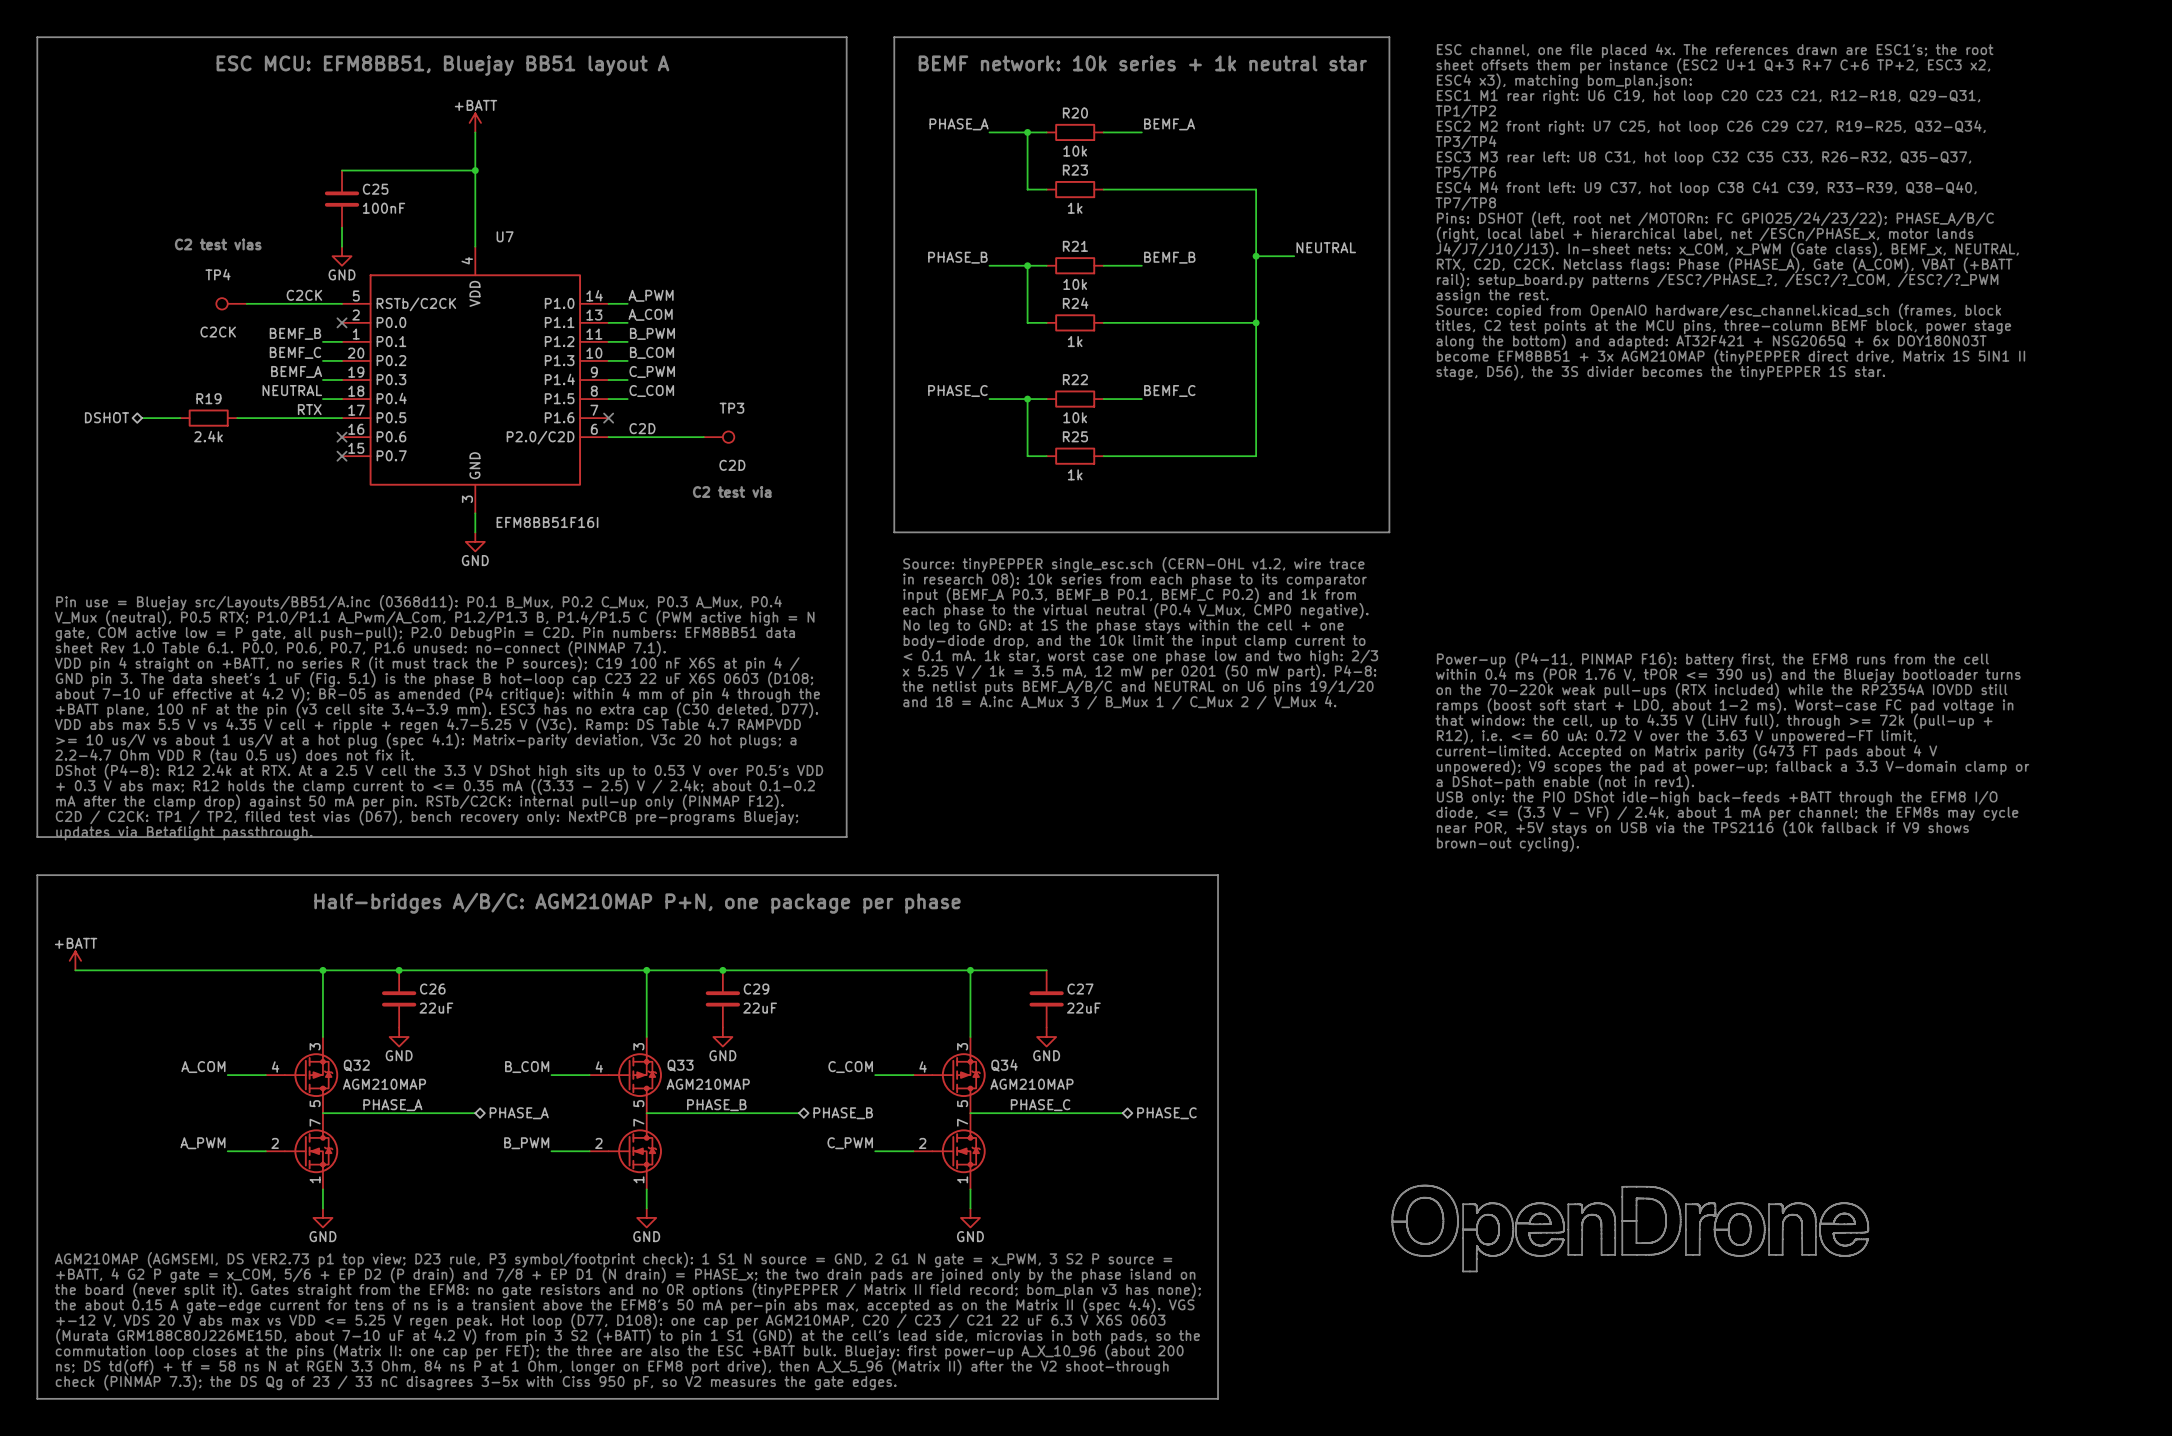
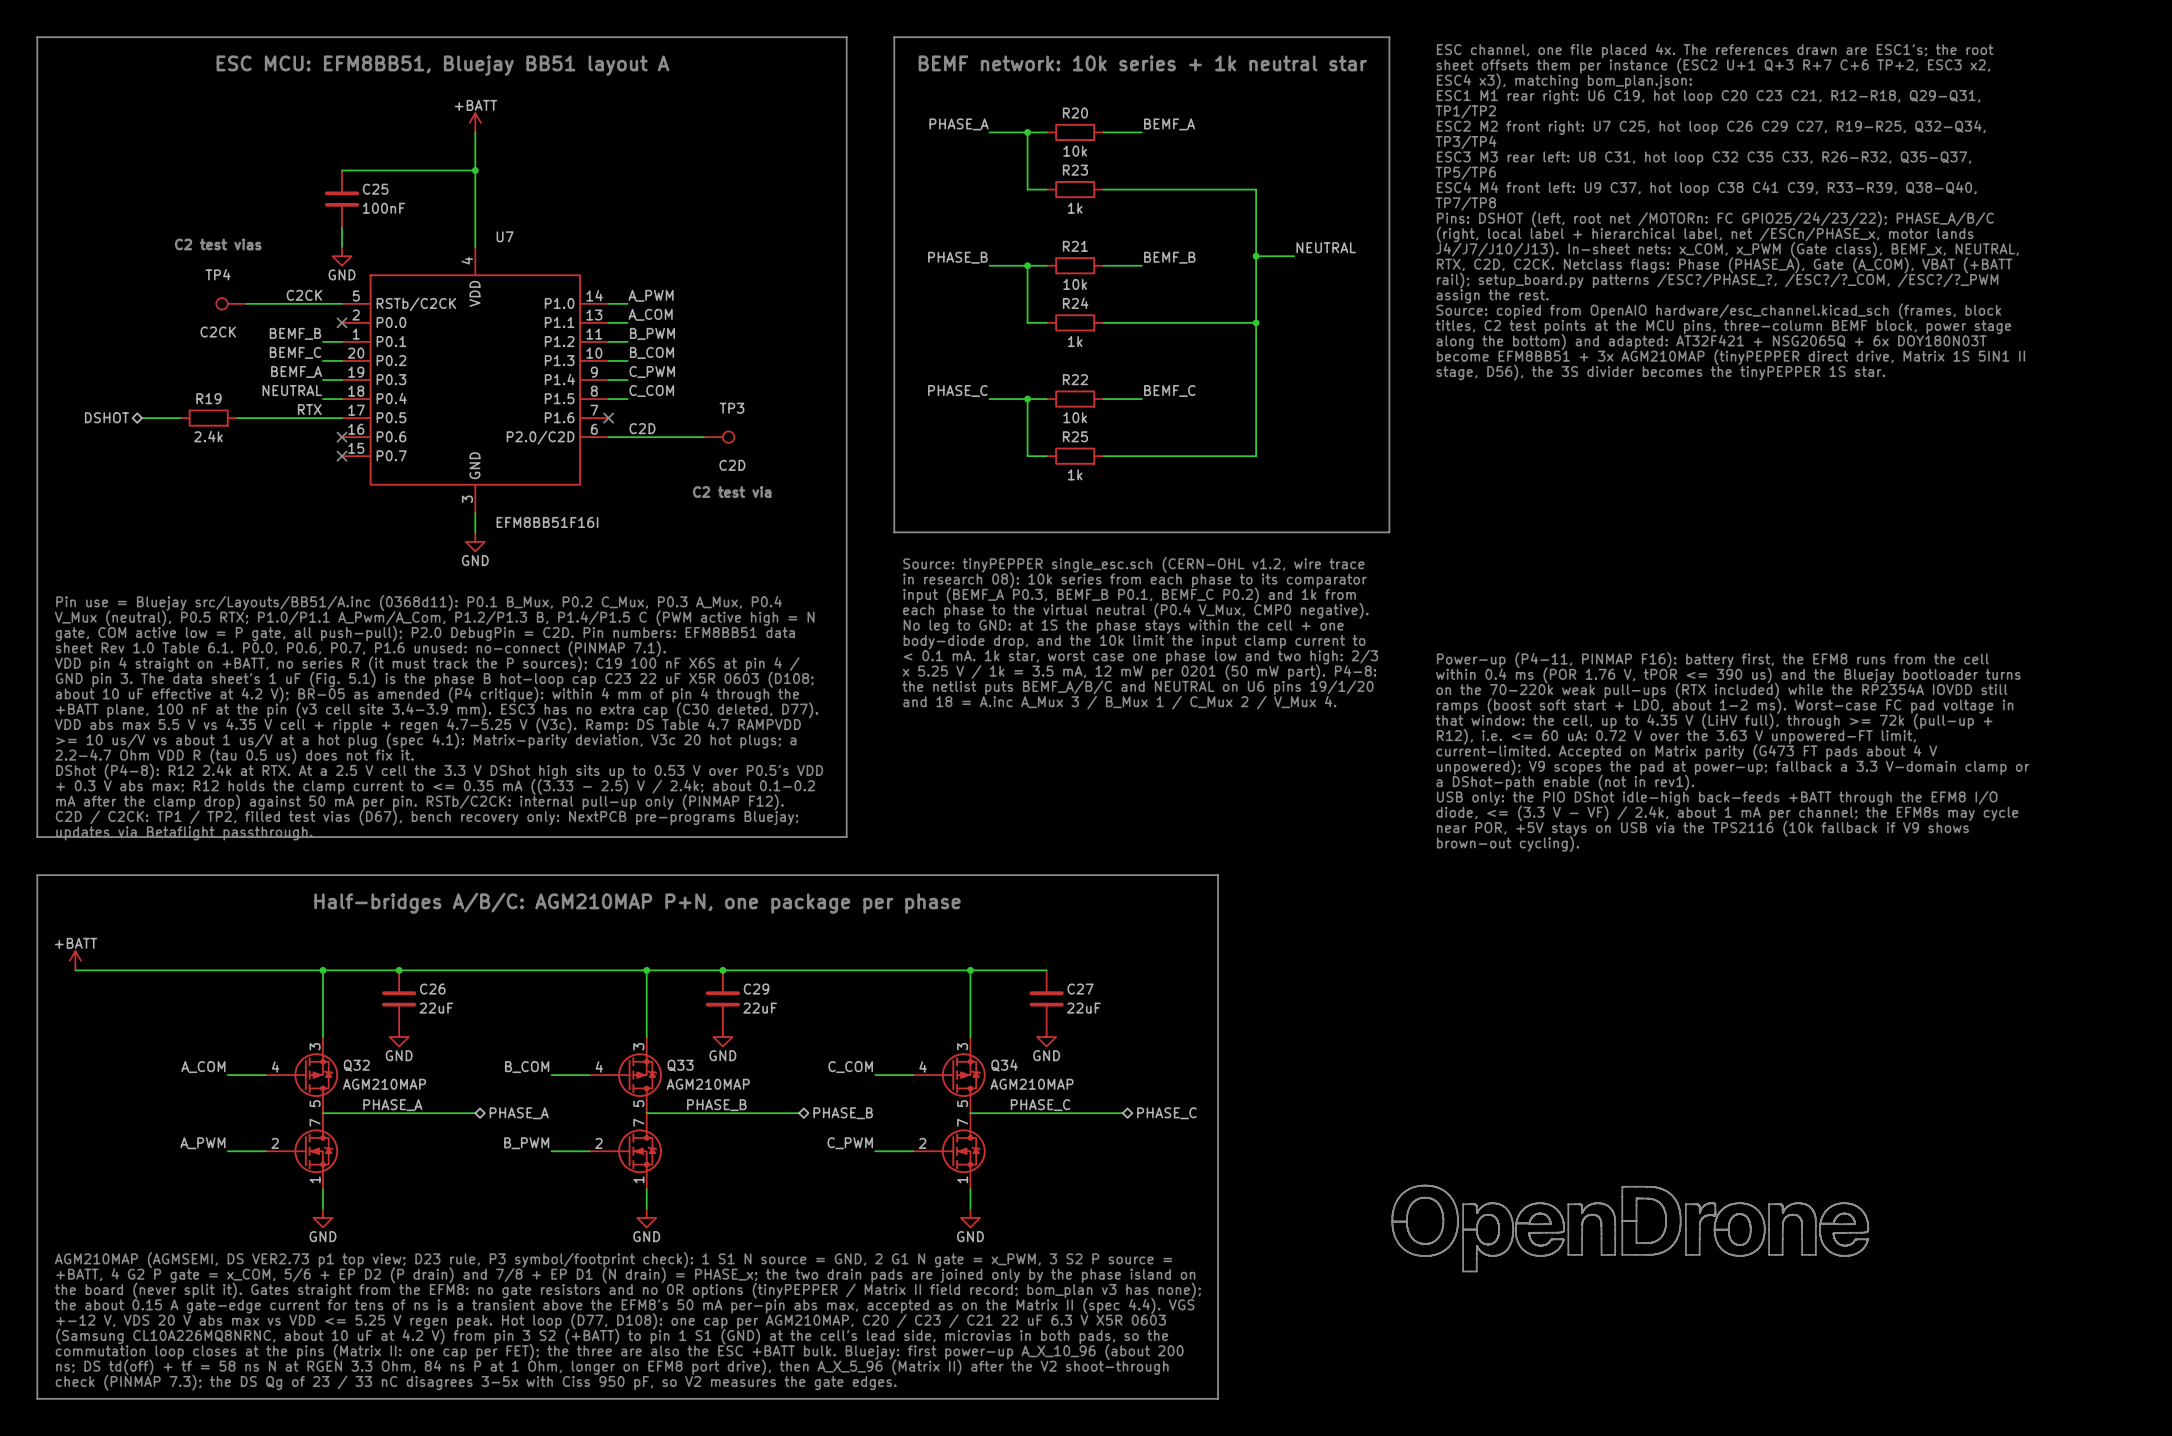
text: GND pin 3. The data sheet's 1 uF (Fig. 5.1) is the phase B hot-loop cap C23 22 uF X6S 0603 (D108; (434, 679) -> GND pin 3. The data sheet's 1 uF (Fig. 5.1) is the phase B hot-loop cap C23 22 uF X5R 0603 (D108; (434, 679)
text: about 7-10 uF effective at 4.2 V); BR-05 as amended (P4 critique): within 4 mm of pin 4 through the (437, 694) -> about 10 uF effective at 4.2 V); BR-05 as amended (P4 critique): within 4 mm of pin 4 through the (427, 694)
text: +-12 V, VDS 20 V abs max vs VDD <= 5.25 V regen peak. Hot loop (D77, D108): one cap per AGM210MAP, C20 / C23 / C21 22 uF 6.3 V X6S 0603 (610, 1321) -> +-12 V, VDS 20 V abs max vs VDD <= 5.25 V regen peak. Hot loop (D77, D108): one cap per AGM210MAP, C20 / C23 / C21 22 uF 6.3 V X5R 0603 (611, 1321)
text: (Murata GRM188C80J226ME15D, about 7-10 uF at 4.2 V) from pin 3 S2 (+BATT) to pin 1 S1 (GND) at the cell's lead side, microvias in both pads, so the (628, 1336) -> (Samsung CL10A226MQ8NRNC, about 10 uF at 4.2 V) from pin 3 S2 (+BATT) to pin 1 S1 (GND) at the cell's lead side, microvias in both pads, so the (612, 1336)

